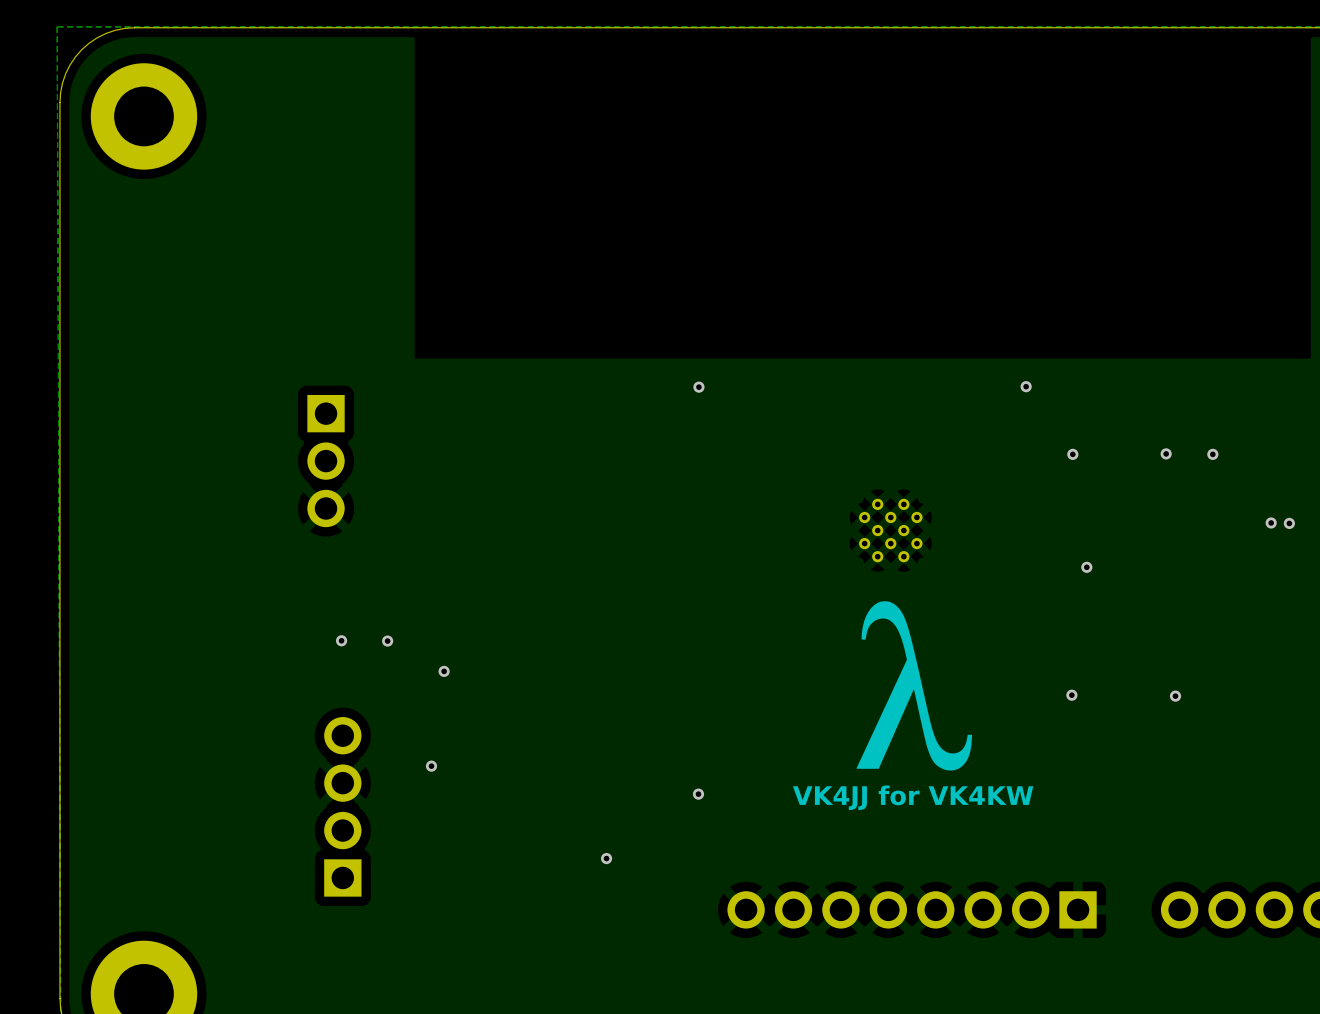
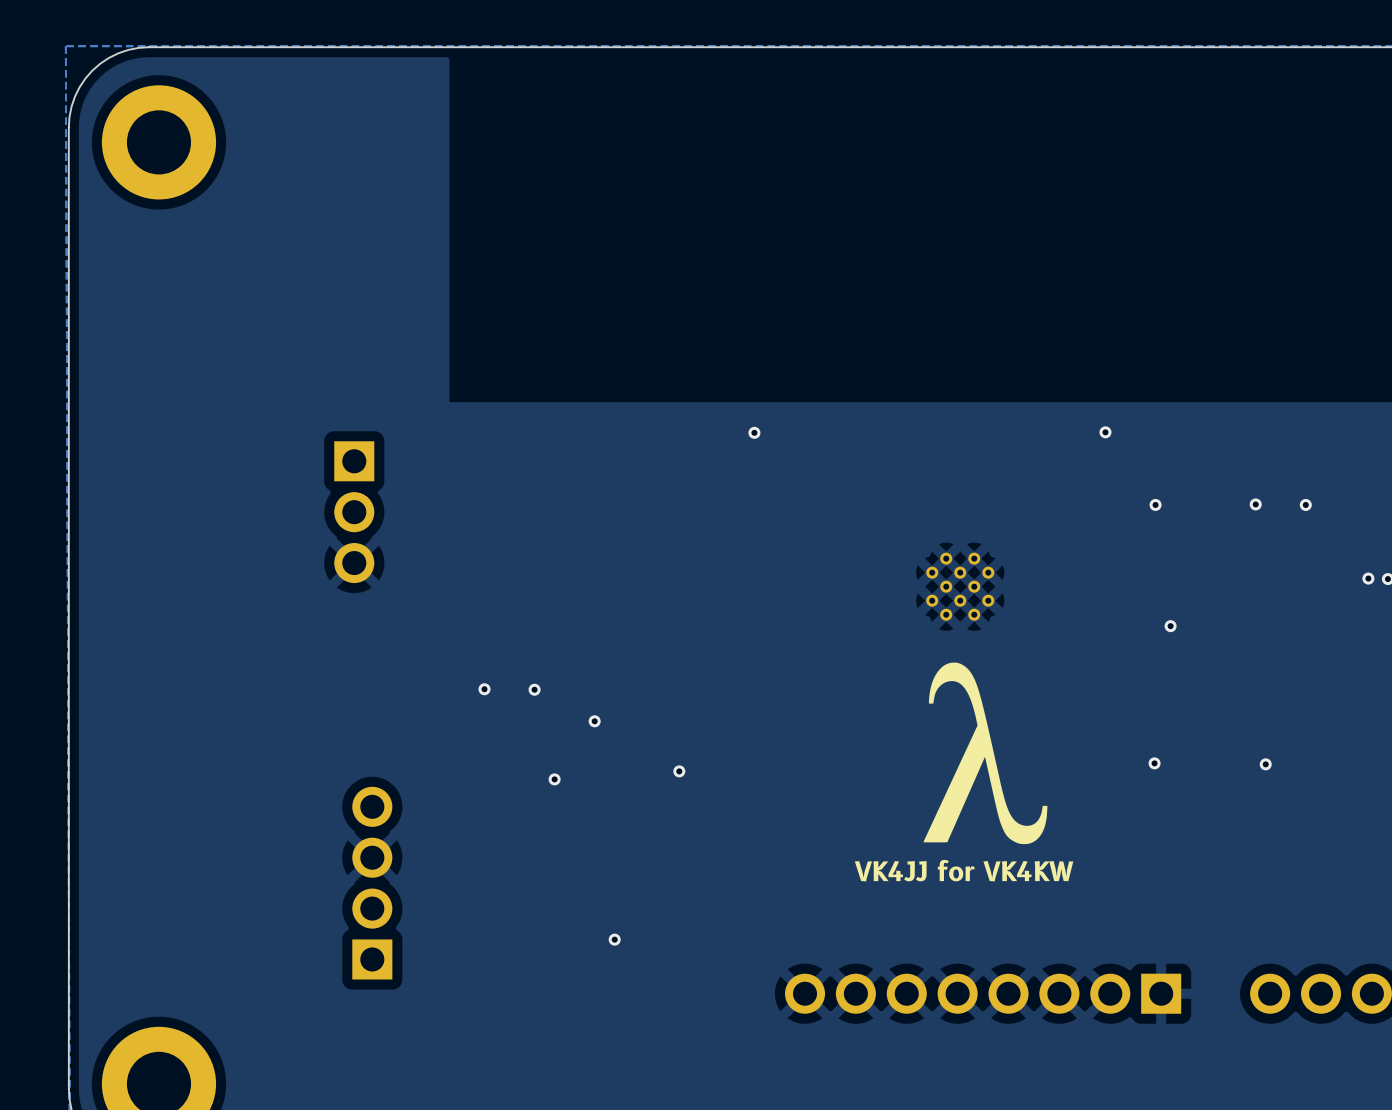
via: none -> (484, 689)
via: none -> (534, 689)
via: (341, 640) -> none
via: (387, 641) -> none
via: none -> (594, 721)
via: (444, 671) -> none
via: none -> (679, 771)
via: none -> (554, 779)
via: (431, 766) -> none
via: (698, 794) -> none
via position: (606, 858) -> (614, 939)

